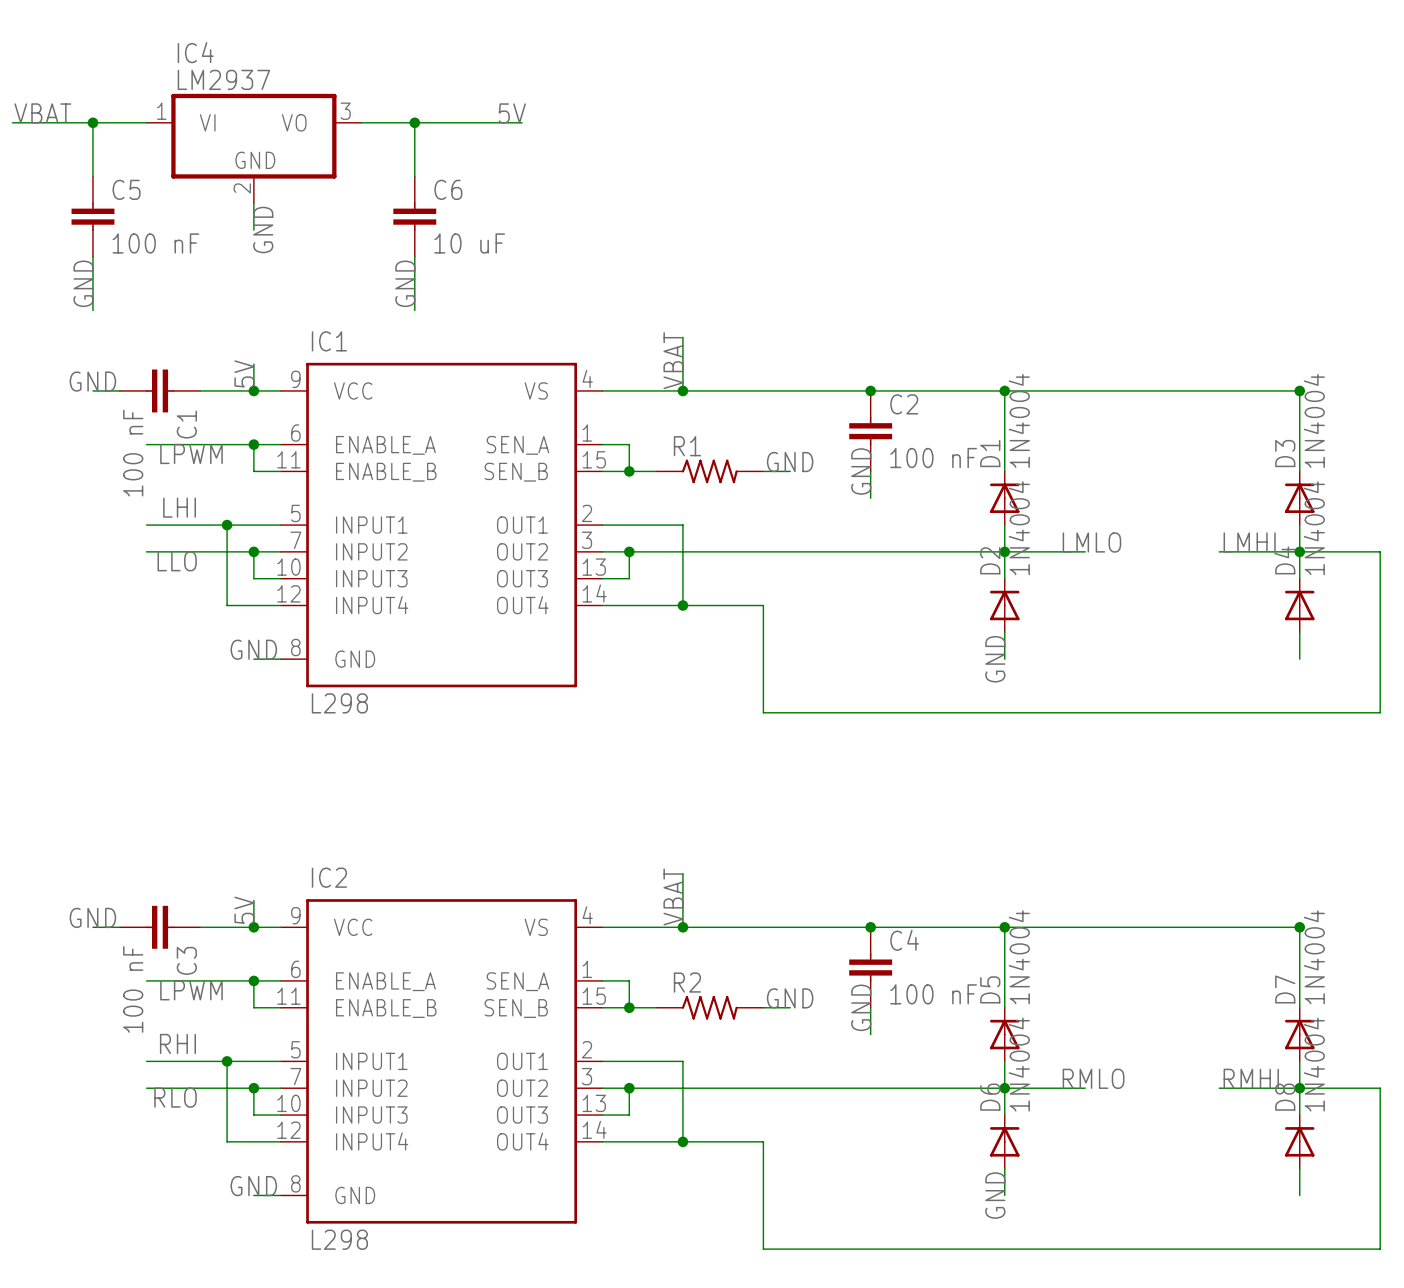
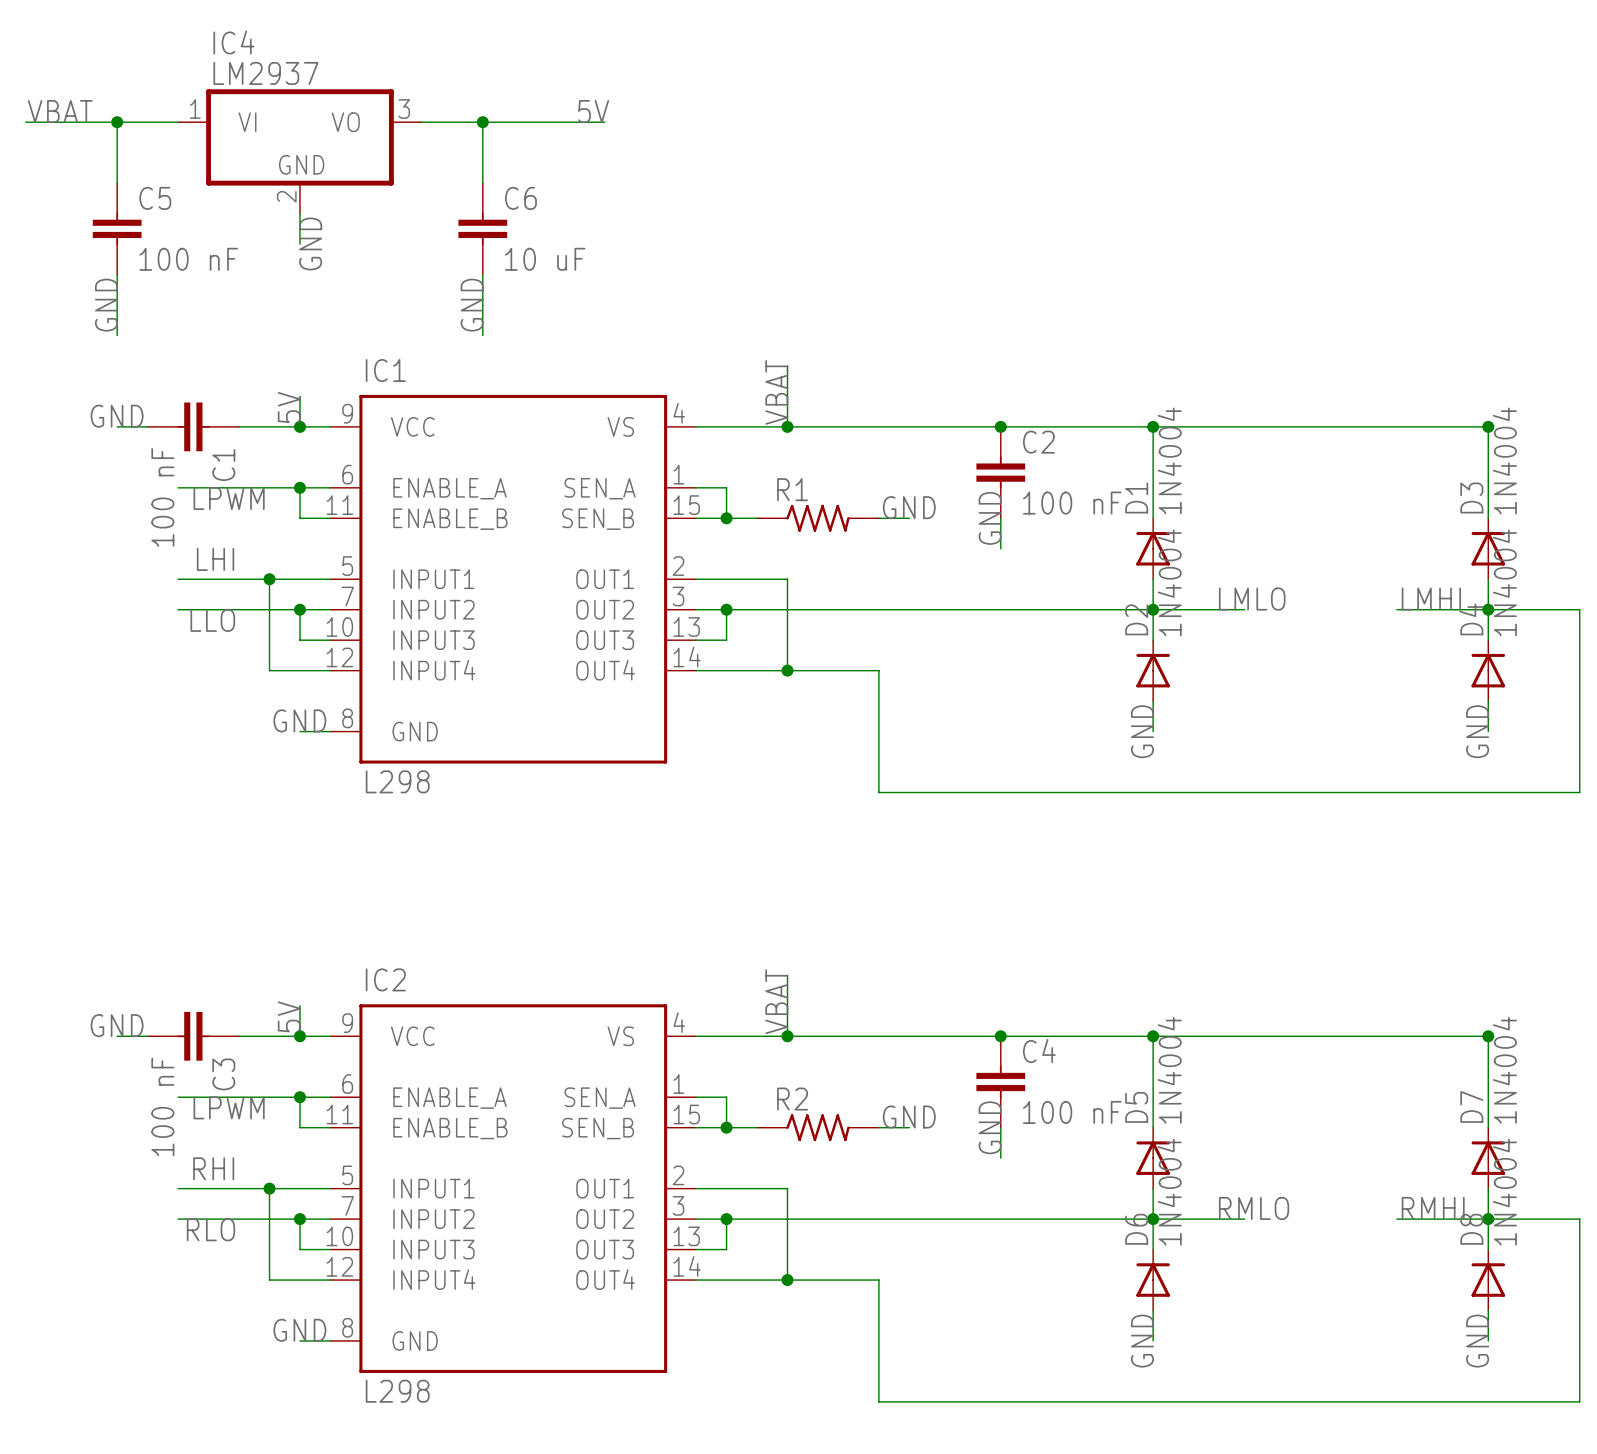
label: none -> GND (1477, 731)
label: none -> GND (1477, 1341)

